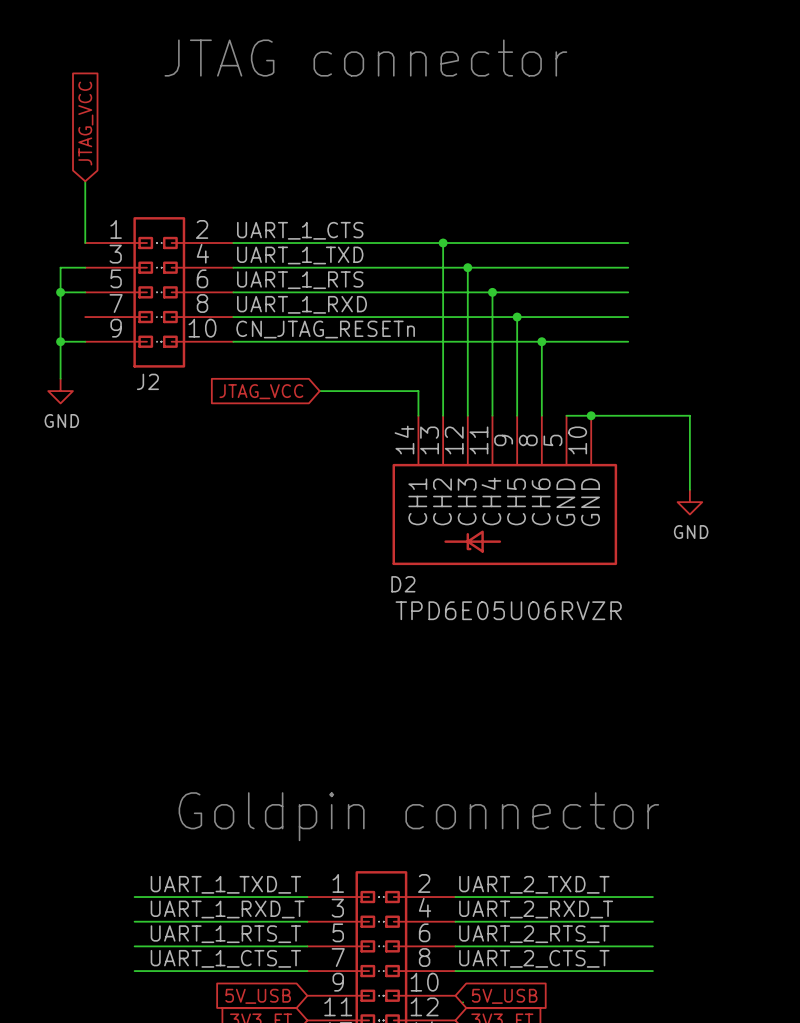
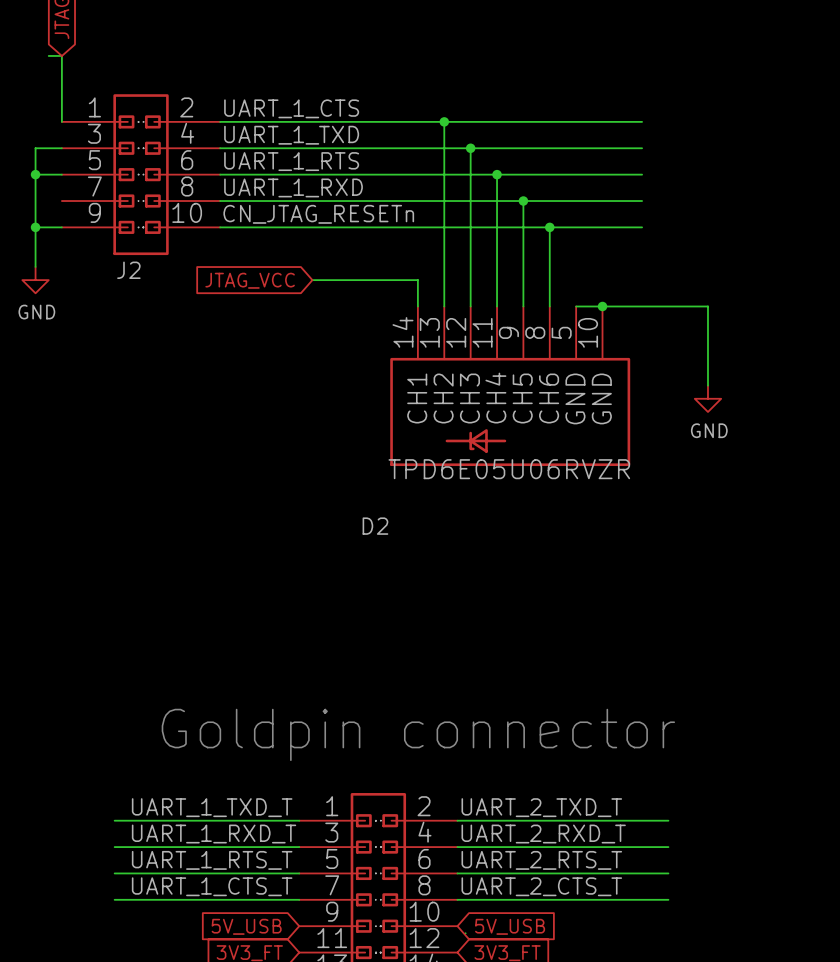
wire: none -> (48, 55) (61, 55)
D2 name position: D2 (403, 584) -> D2 (375, 526)
label position: TPD6E05U06RVZR (508, 610) -> TPD6E05U06RVZR (509, 469)

